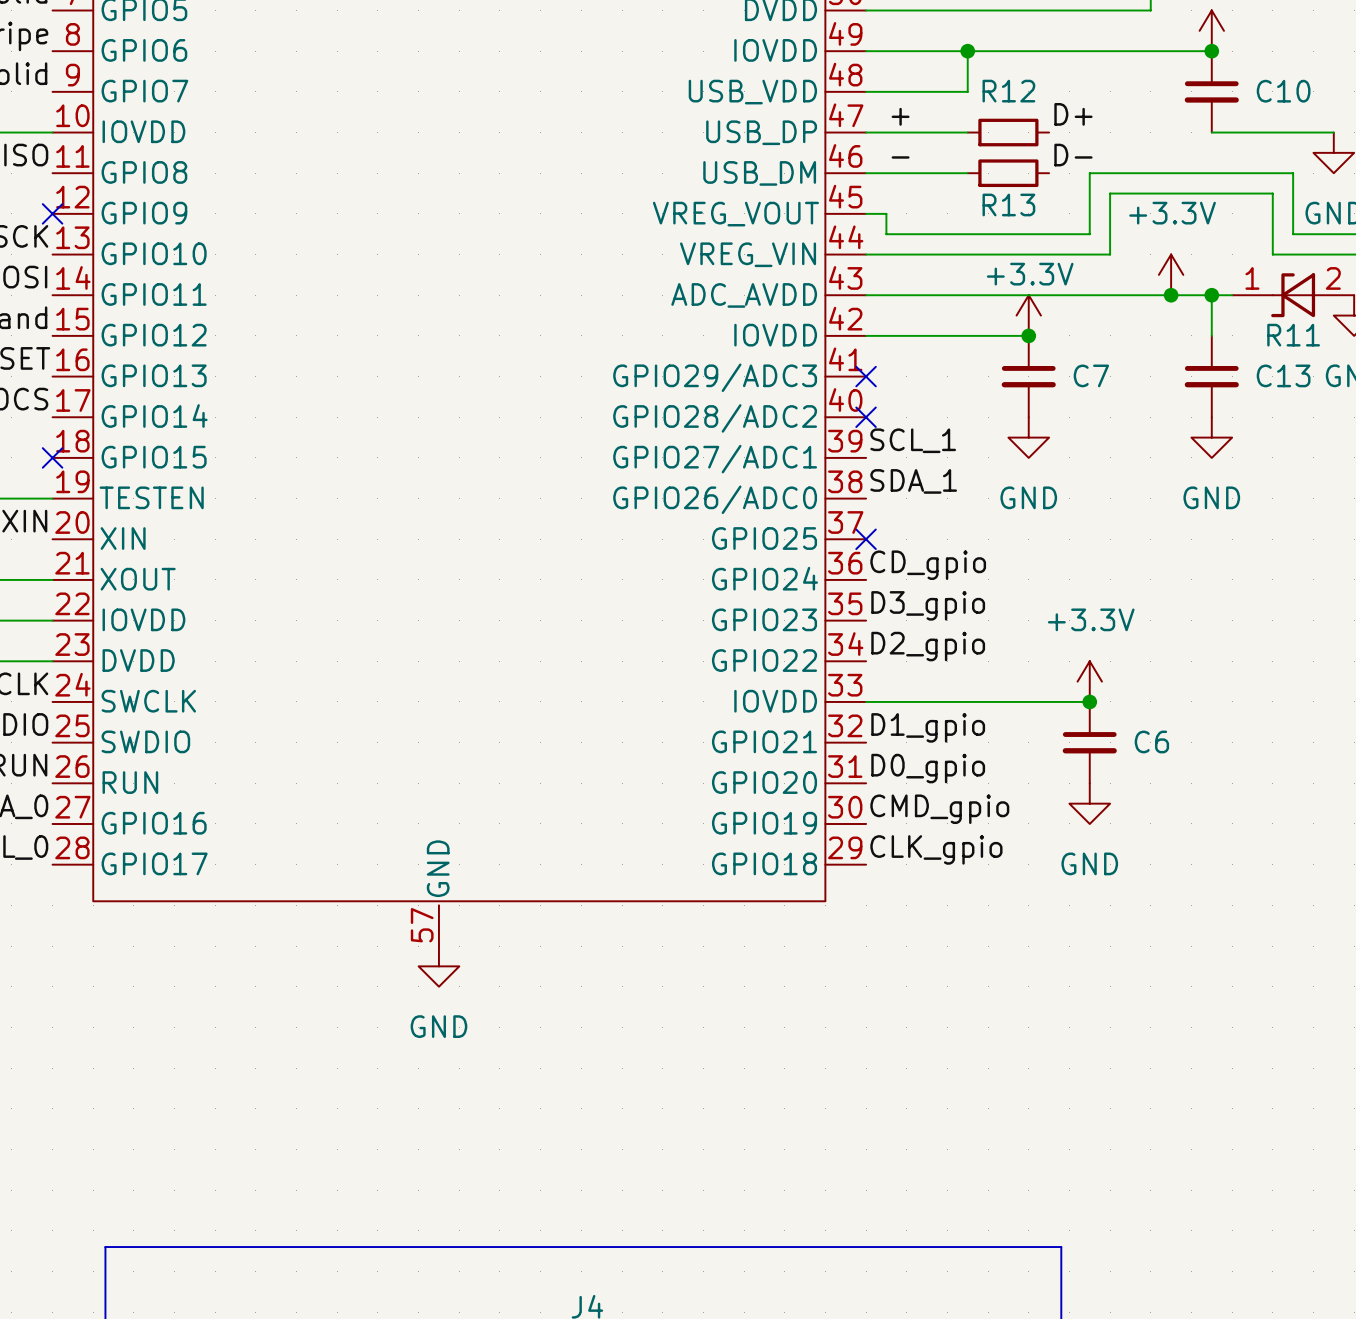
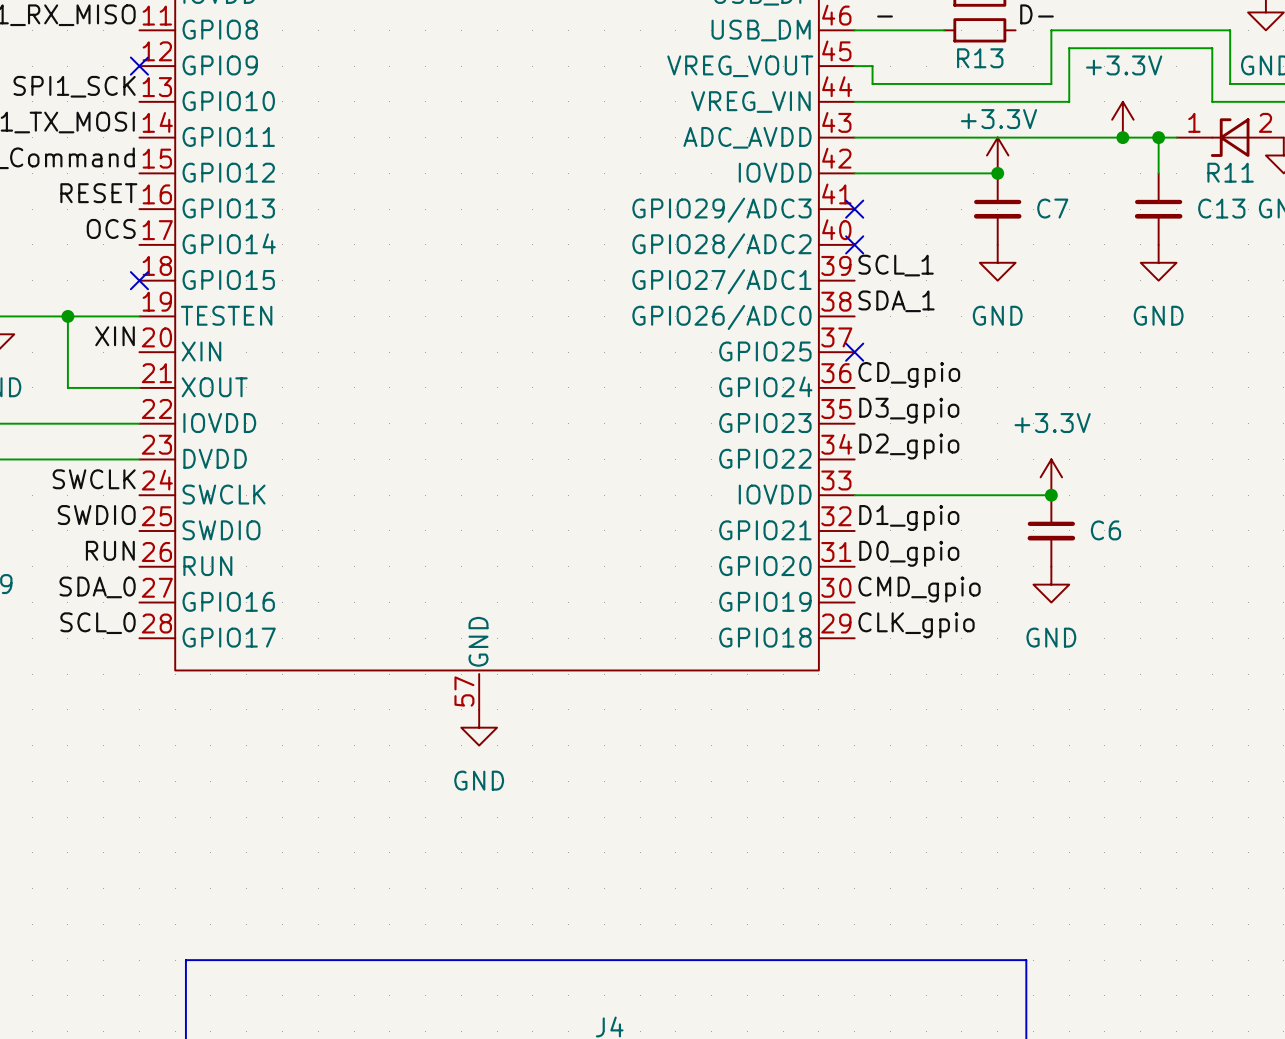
line: (105, 1247) (1061, 1247) -> (185, 974) (185, 960) (1026, 960) (1026, 974)

